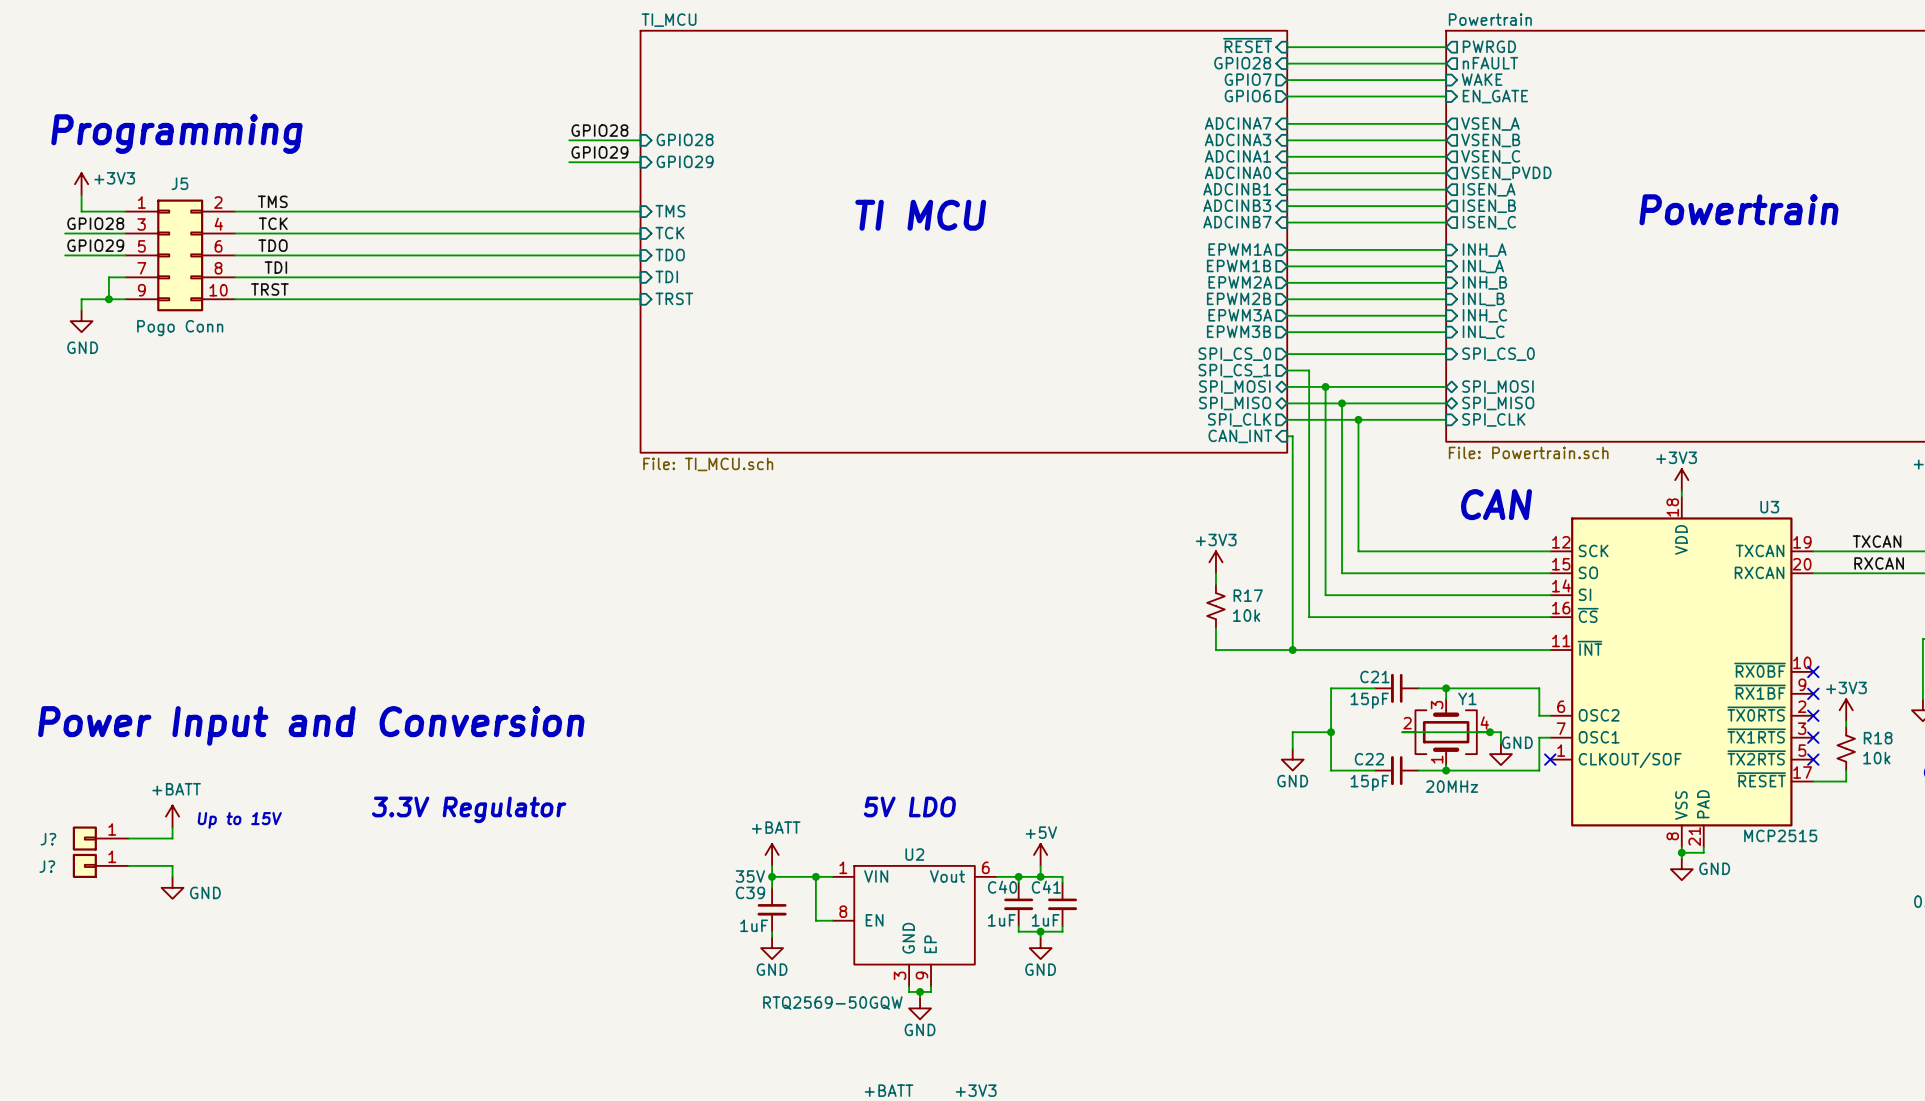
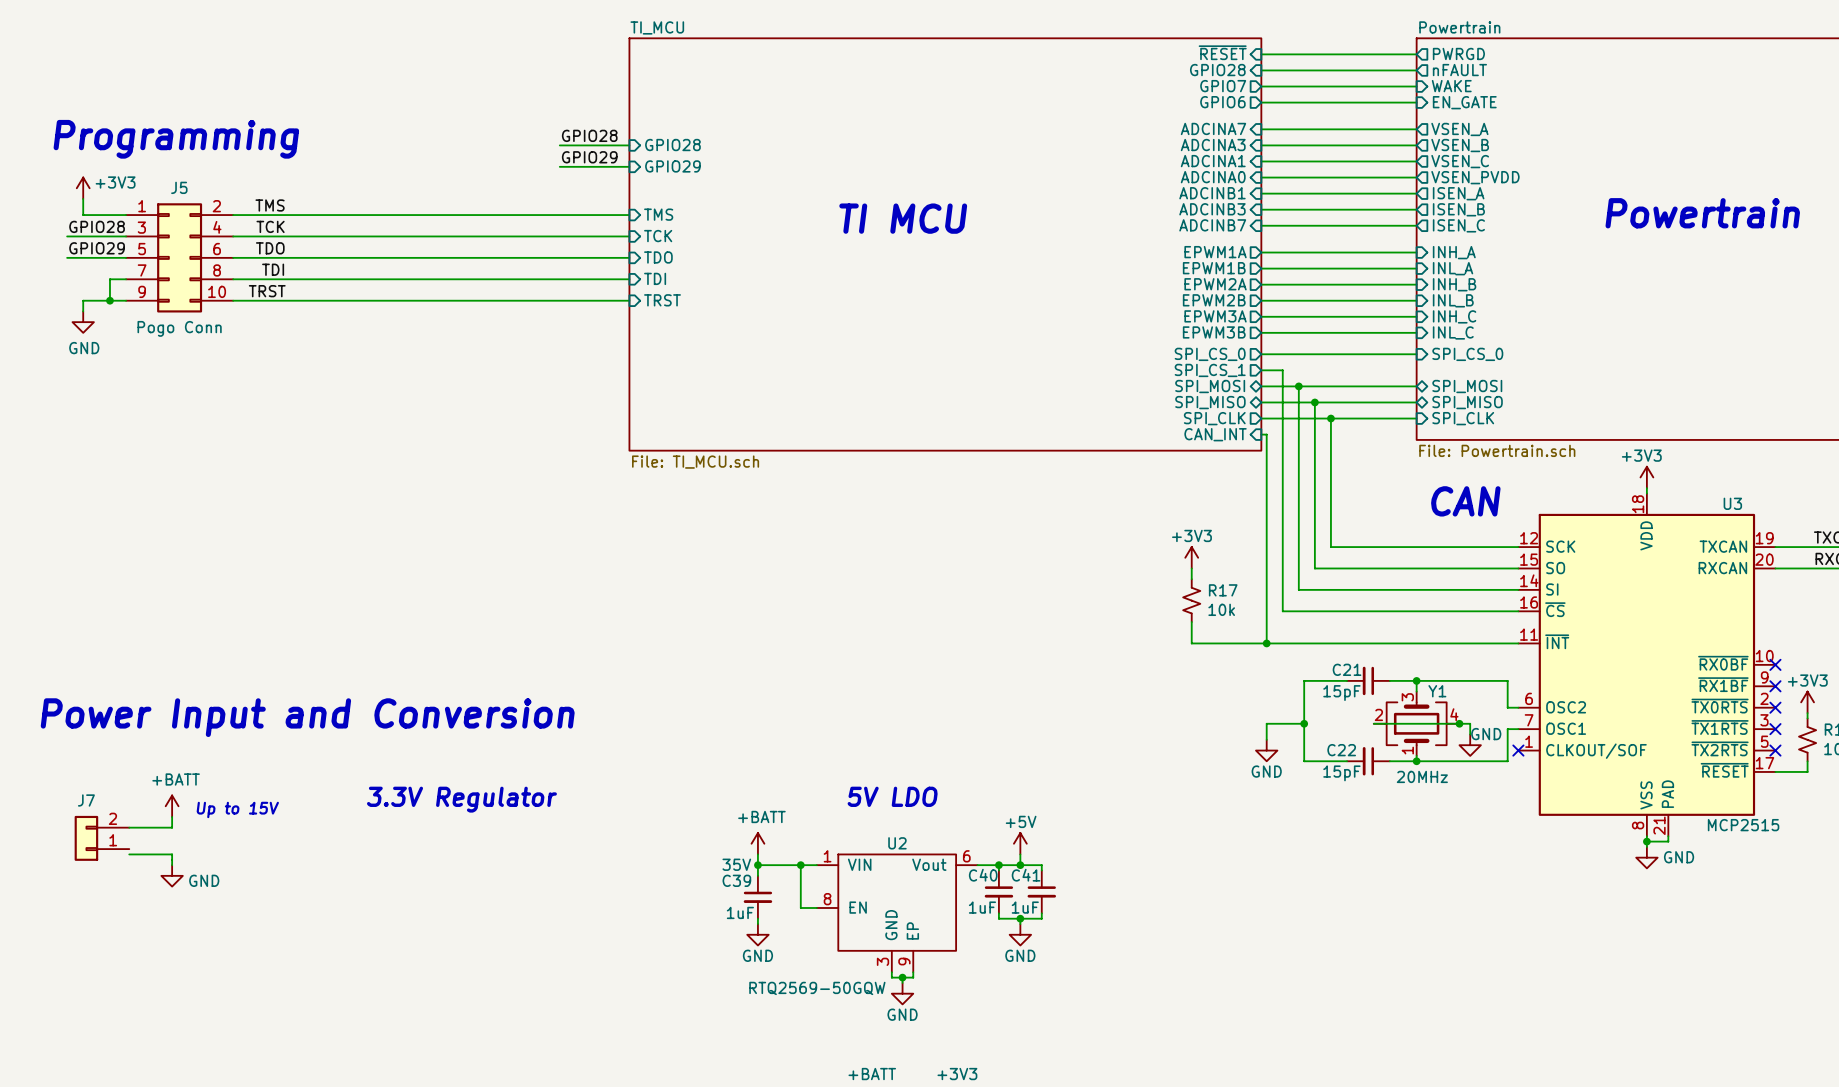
J?: (100, 838) -> none
J7: none -> (101, 838)
J?: (100, 865) -> none

